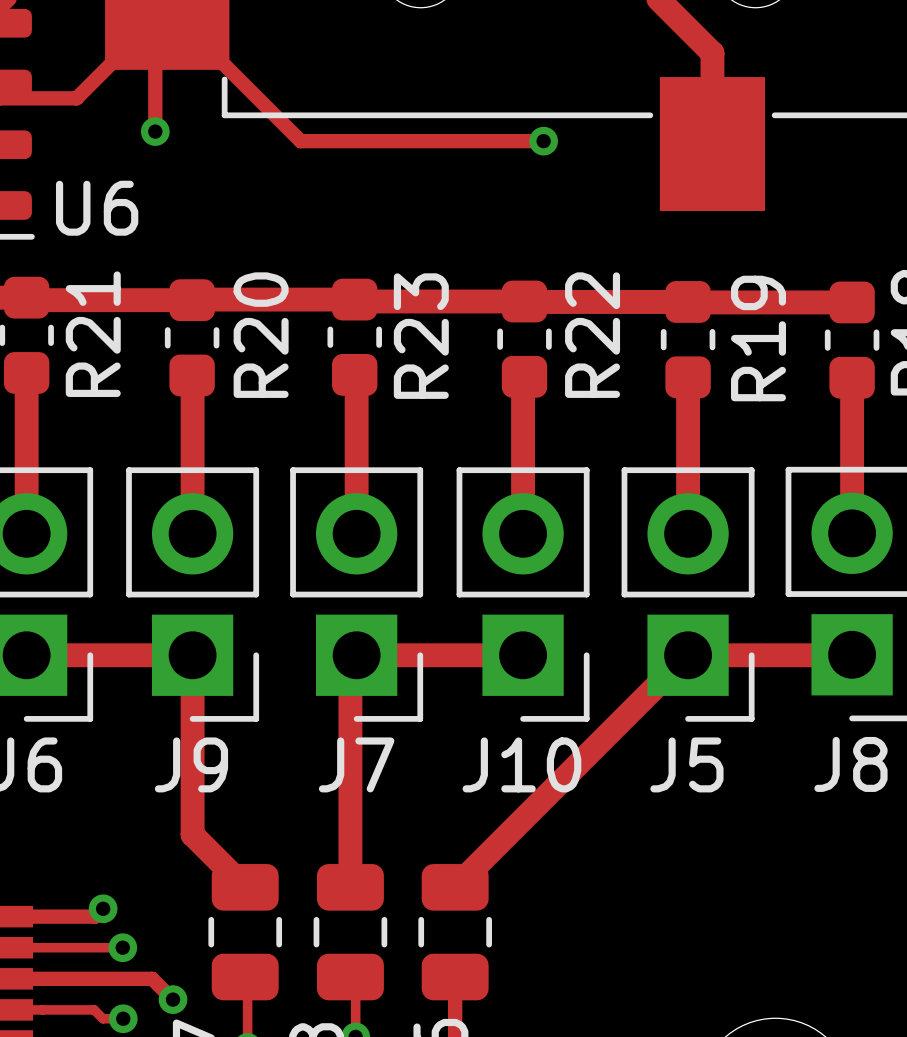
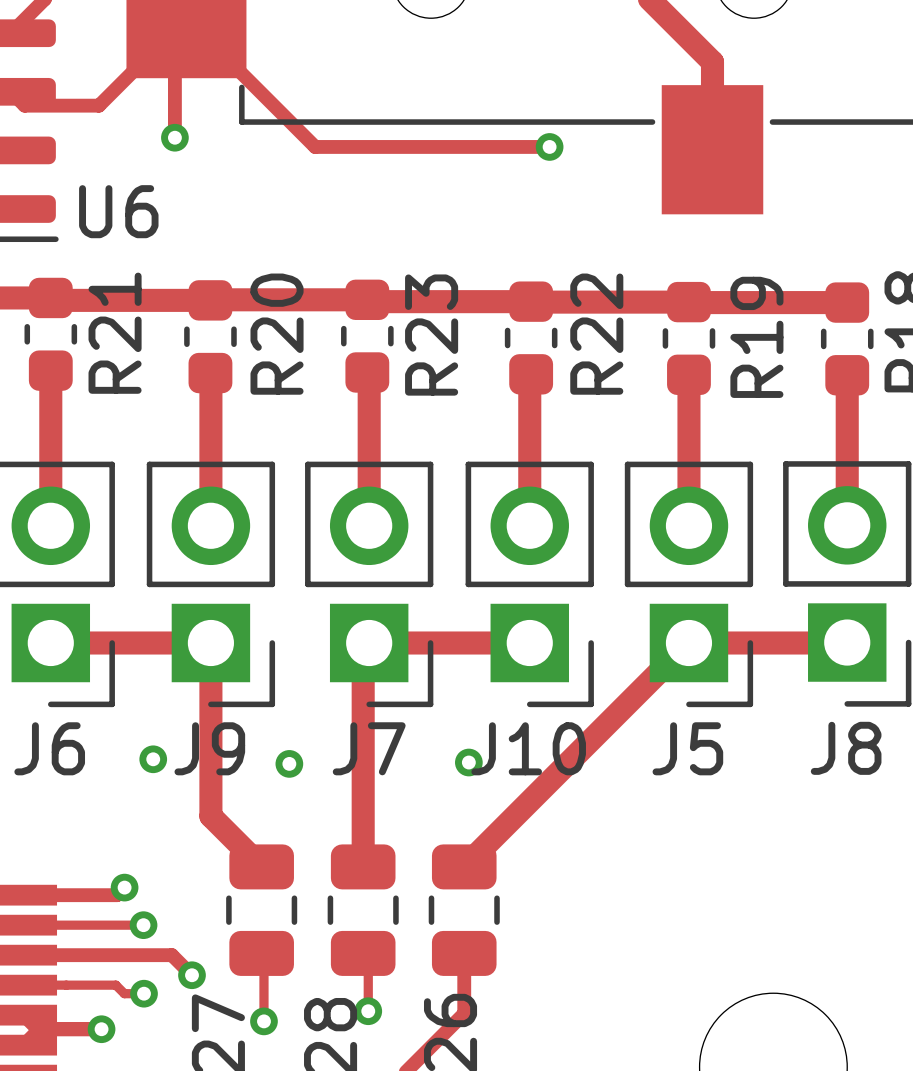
via: none -> (153, 759)
via: none -> (468, 762)
via: none -> (289, 763)

